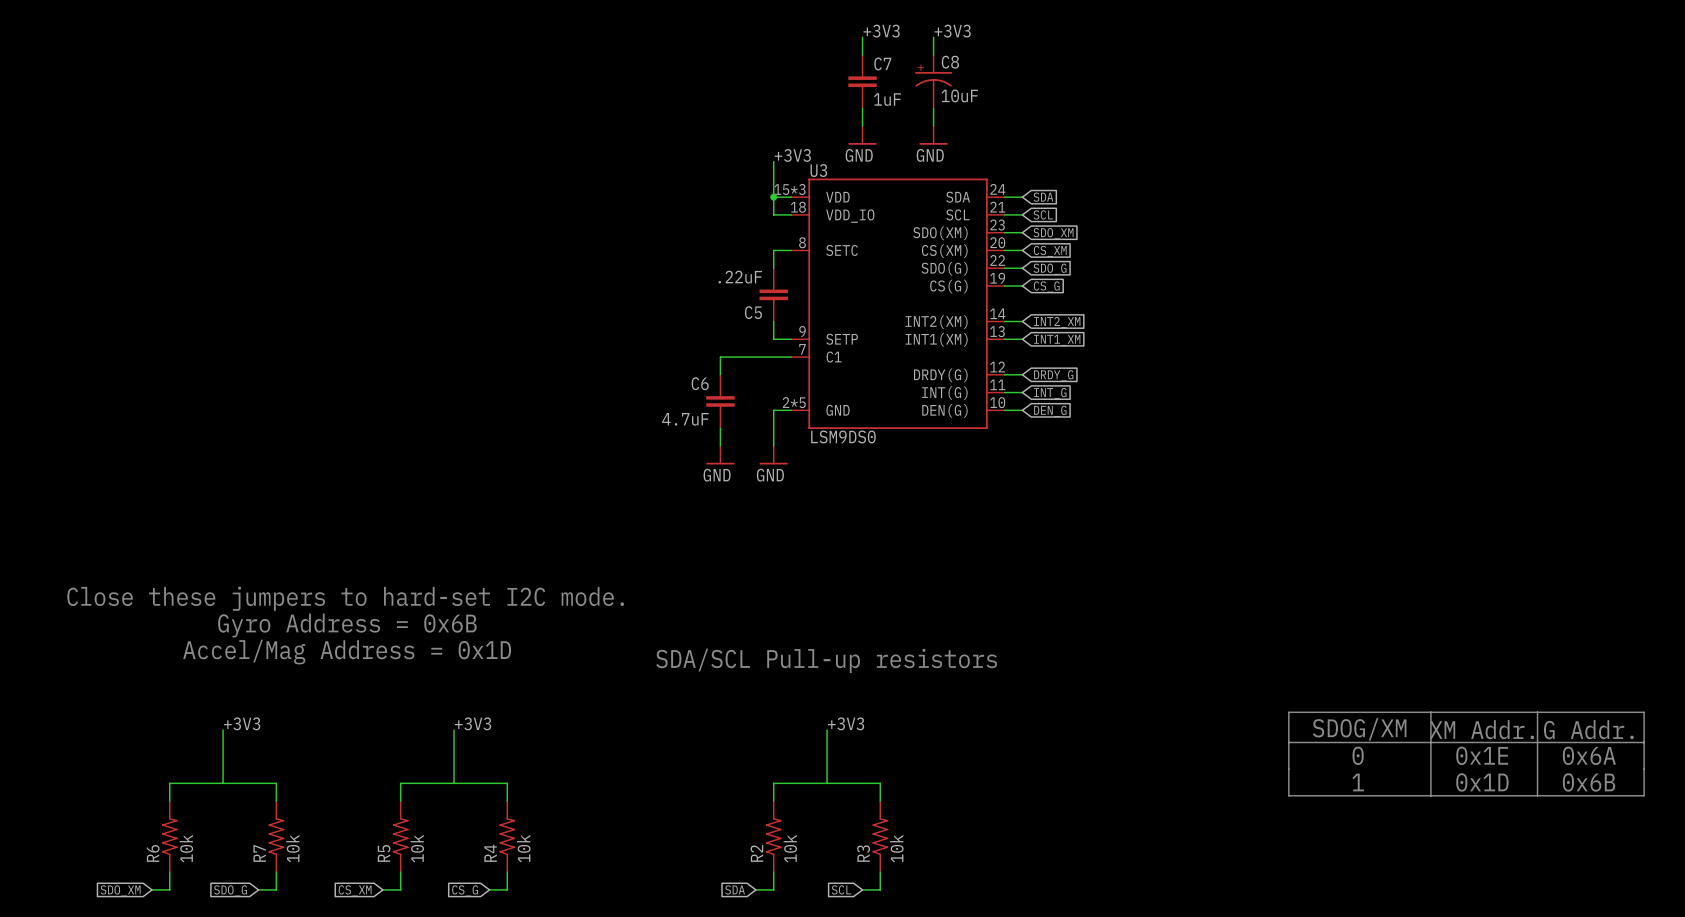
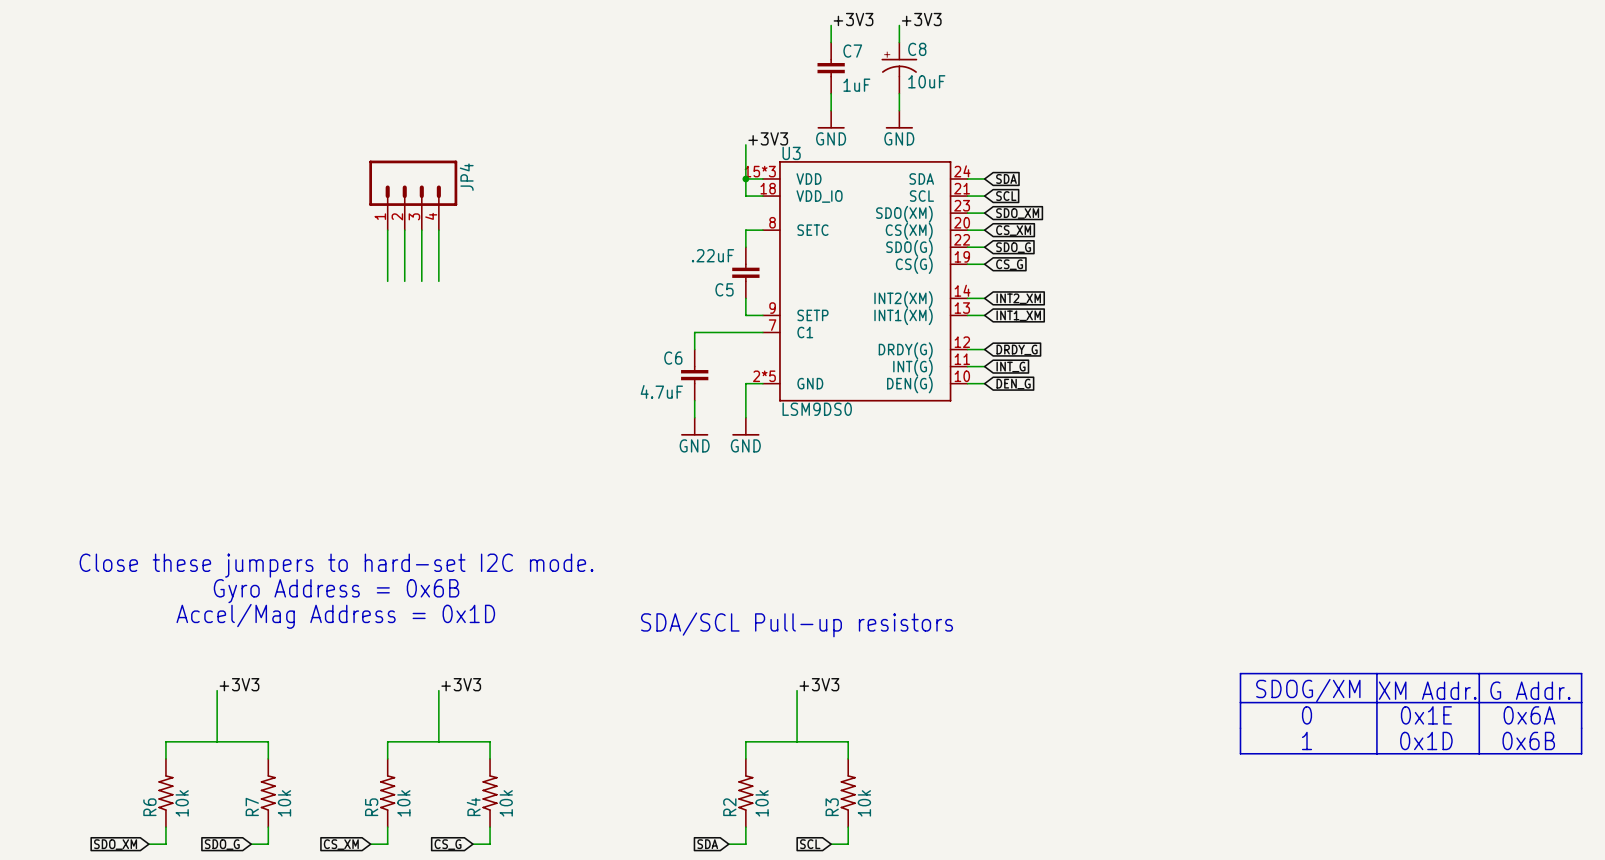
JP4: none -> (413, 195)
wire: none -> (387, 230) (387, 281)
wire: none -> (404, 230) (404, 281)
wire: none -> (421, 230) (421, 281)
wire: none -> (438, 230) (438, 281)

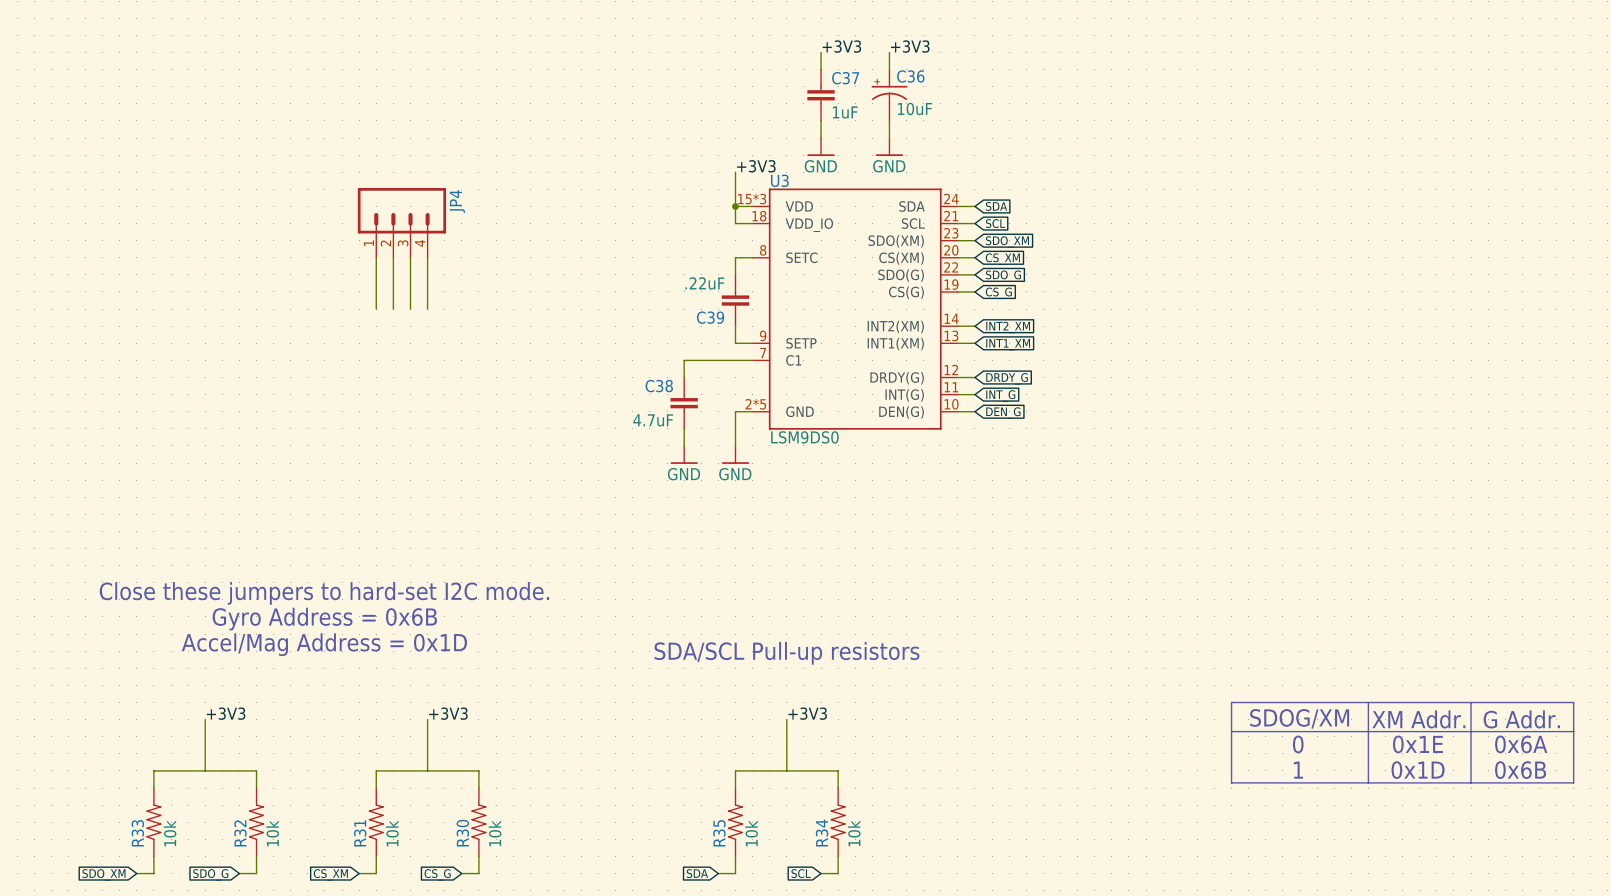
C8 name: C8 (917, 49) -> C36 (910, 76)
C7 name: C7 (852, 51) -> C37 (845, 78)
C5 name: C5 (724, 289) -> C39 (710, 317)
C6 name: C6 (673, 358) -> C38 (659, 386)
R7 name: R7 (252, 806) -> R32 (240, 833)
R4 name: R4 (473, 806) -> R30 (462, 833)
R6 name: R6 (149, 807) -> R33 (137, 833)
R5 name: R5 (371, 807) -> R31 (360, 833)
R2 name: R2 (729, 807) -> R35 (719, 833)
R3 name: R3 (832, 807) -> R34 (822, 833)

